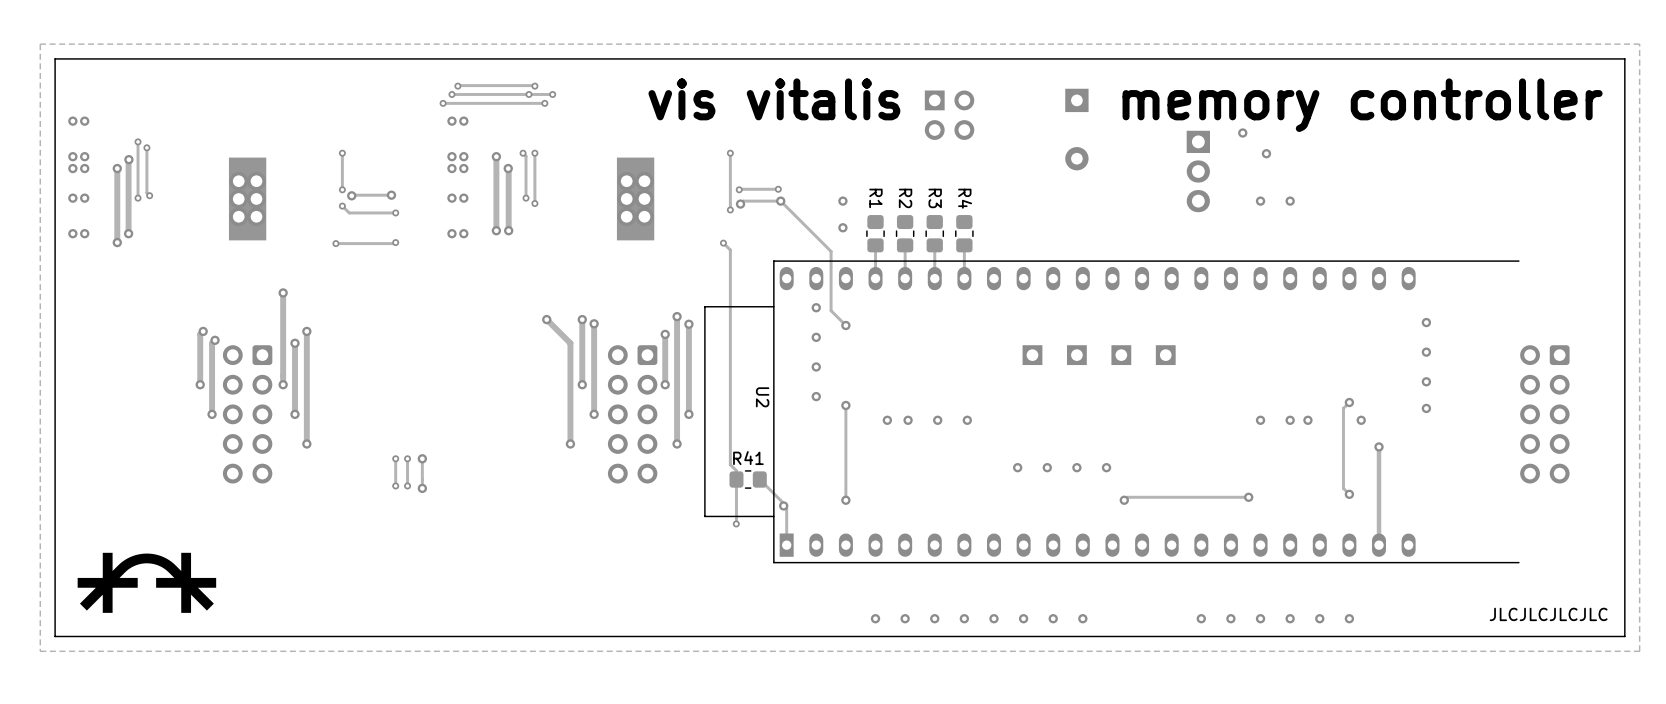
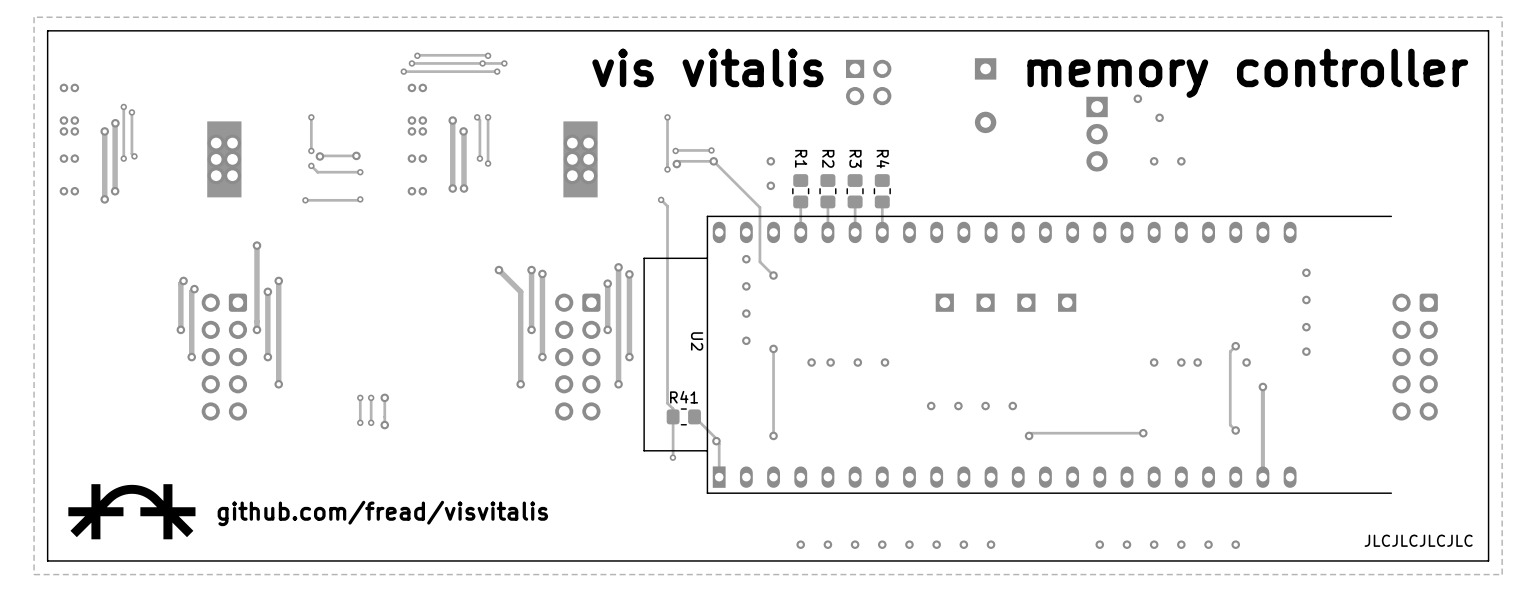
text: none -> github.com/fread/visvitalis (382, 513)

